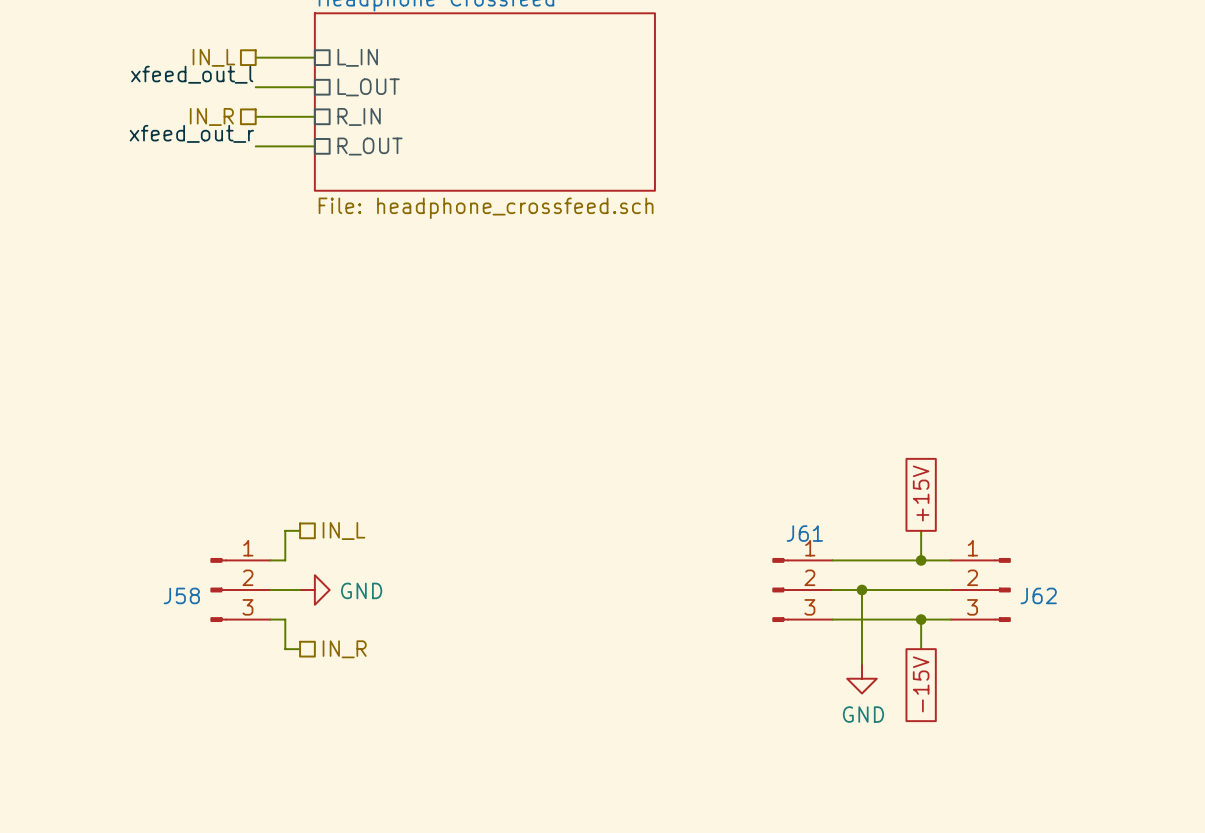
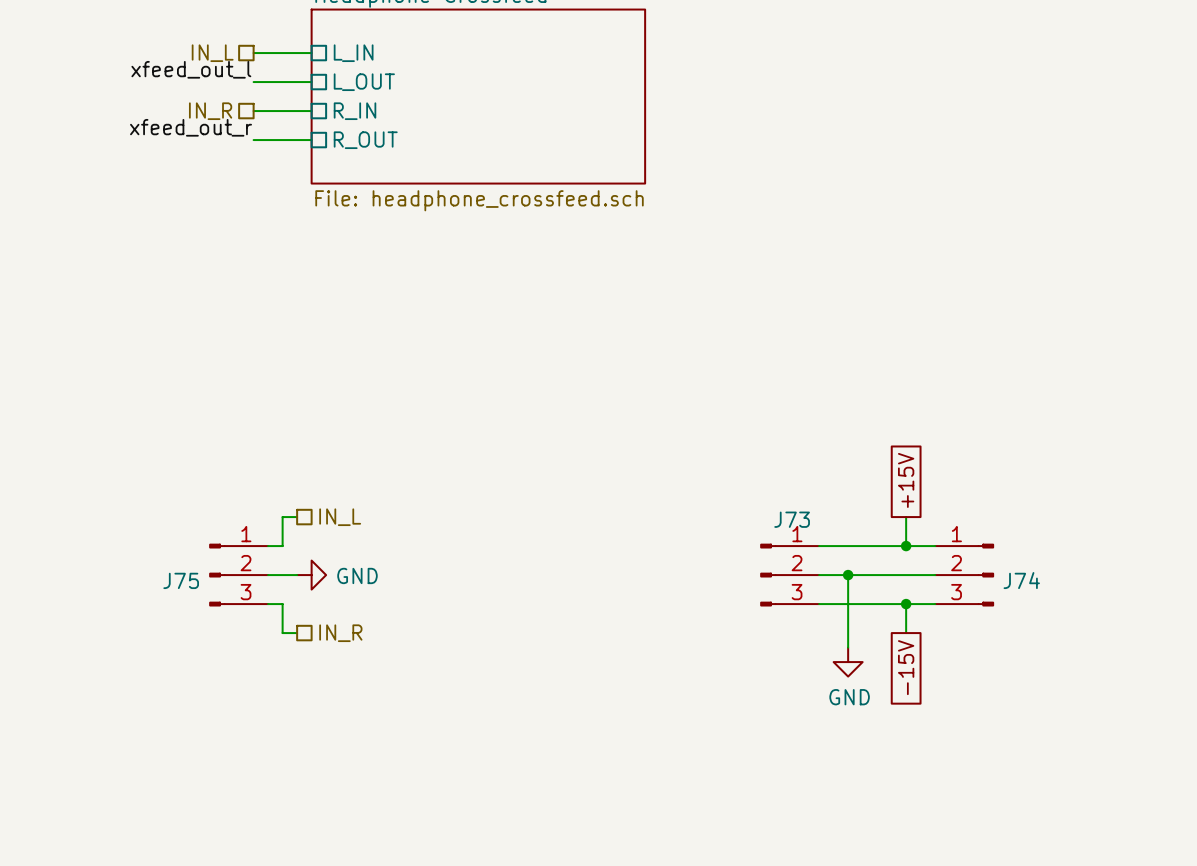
J61 name: J61 (804, 533) -> J73 (792, 519)
J58 name: J58 (181, 595) -> J75 (181, 580)
J62 name: J62 (1038, 595) -> J74 (1021, 580)

